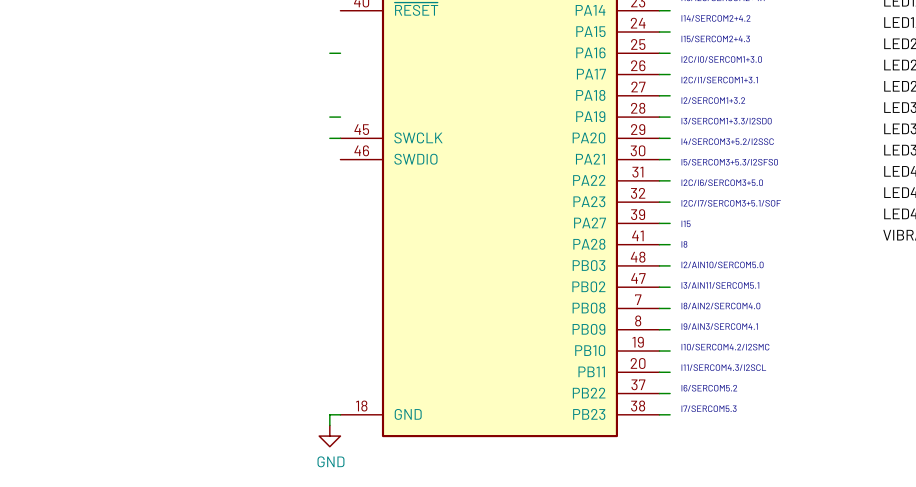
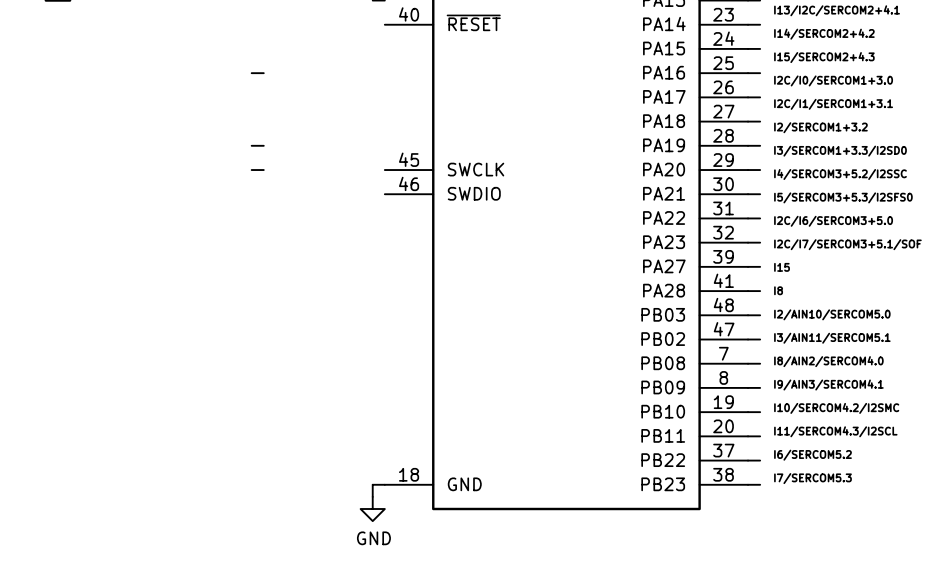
wire: (329, 53) (340, 53) -> (251, 73) (263, 73)
wire: (329, 117) (340, 117) -> (251, 145) (263, 145)
wire: (329, 138) (340, 138) -> (251, 170) (263, 170)

